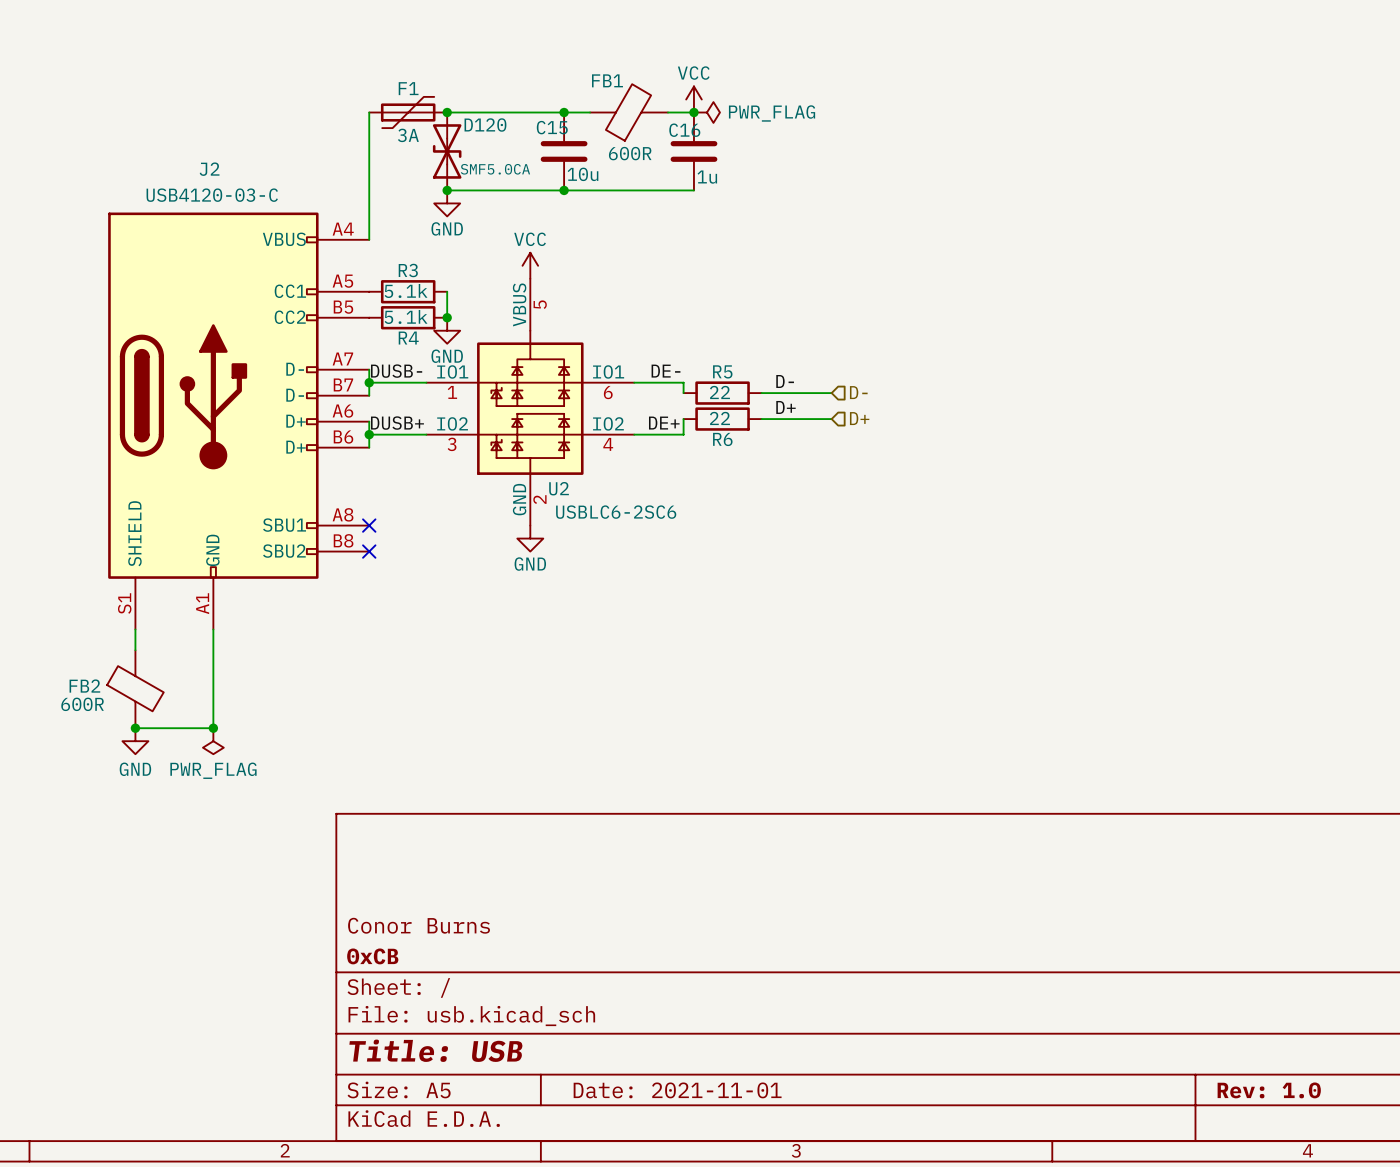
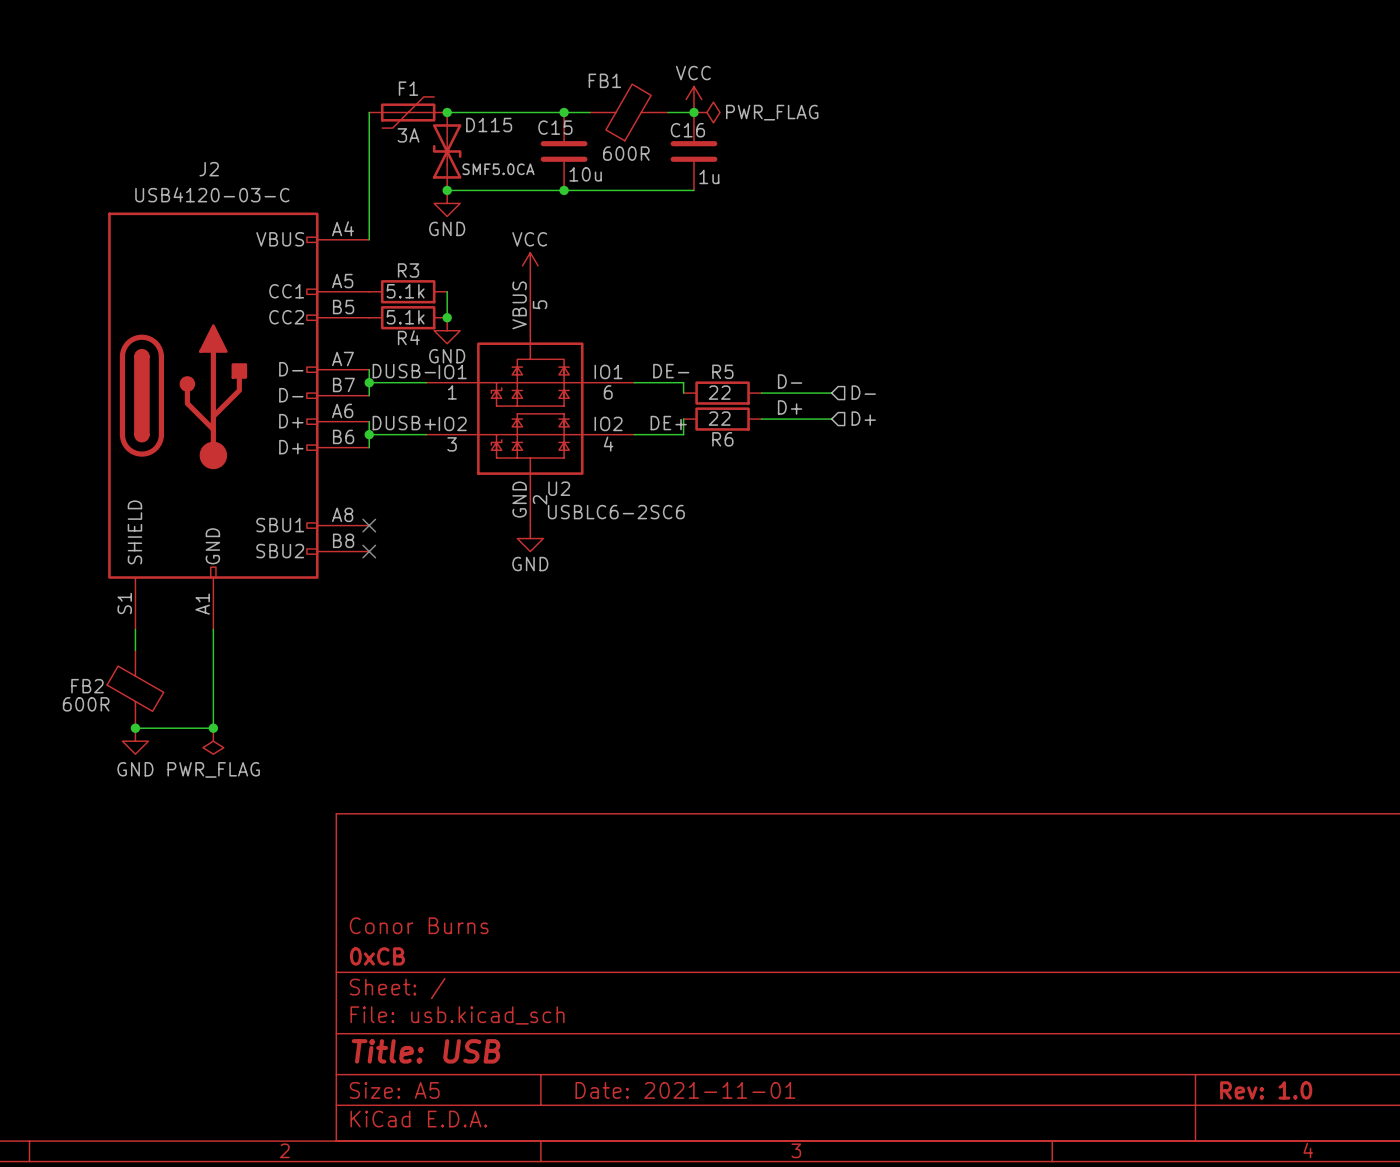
D120 name: D120 (485, 125) -> D115 (489, 125)

